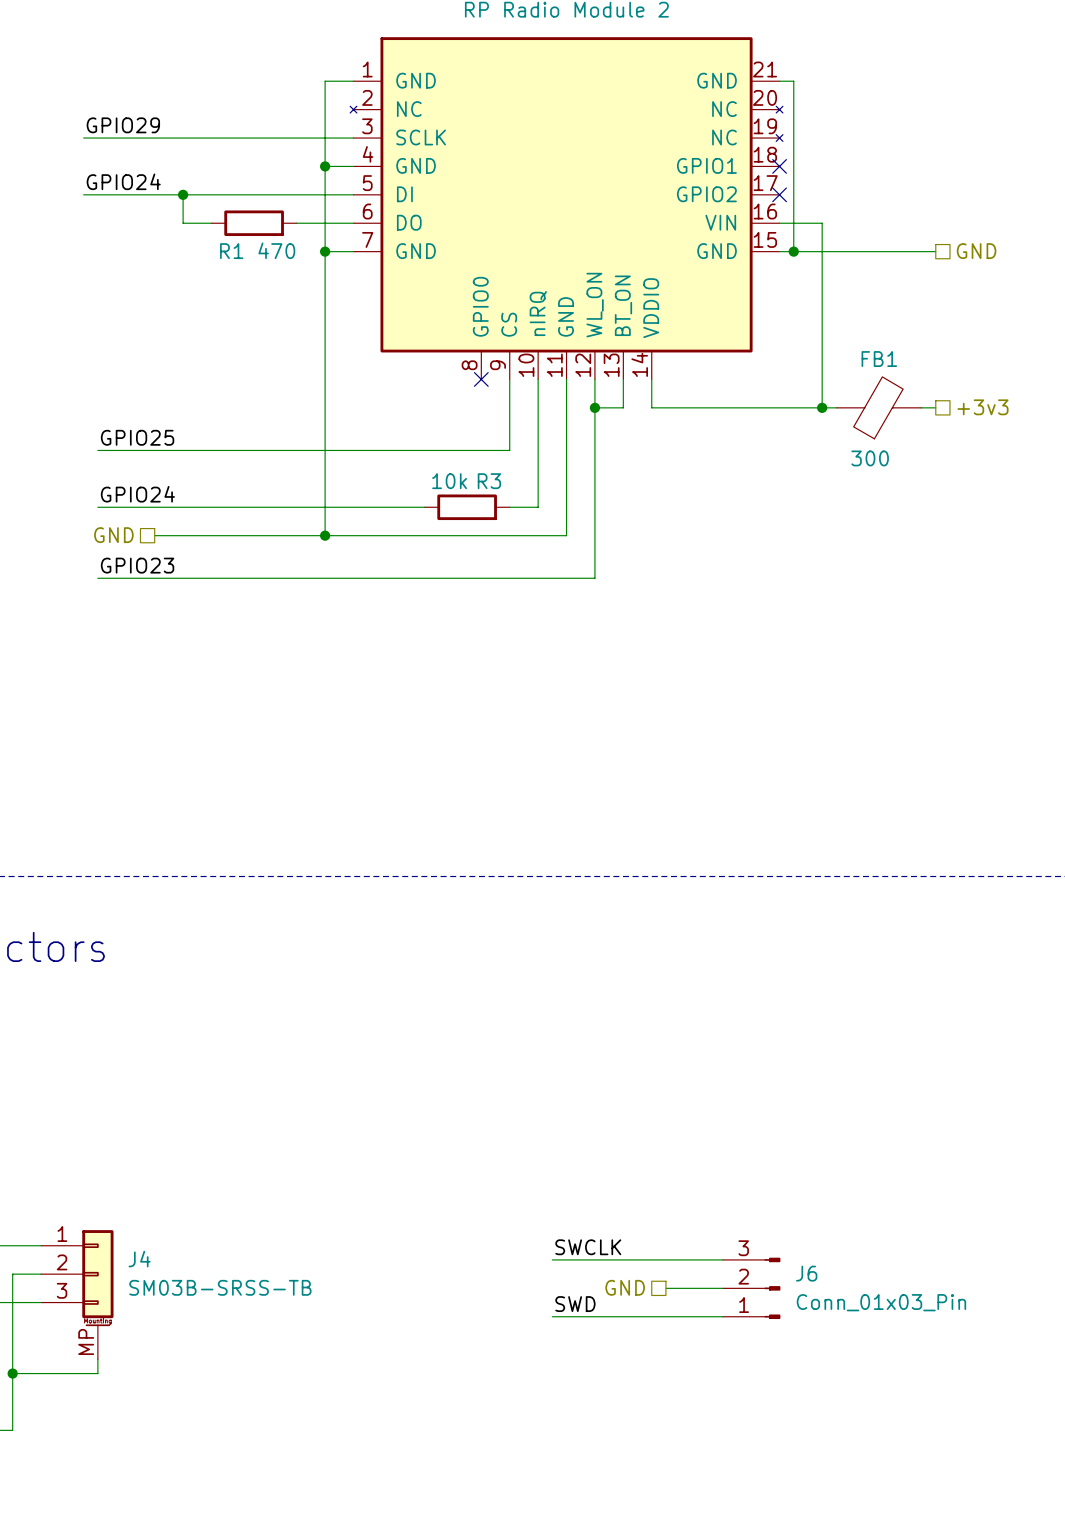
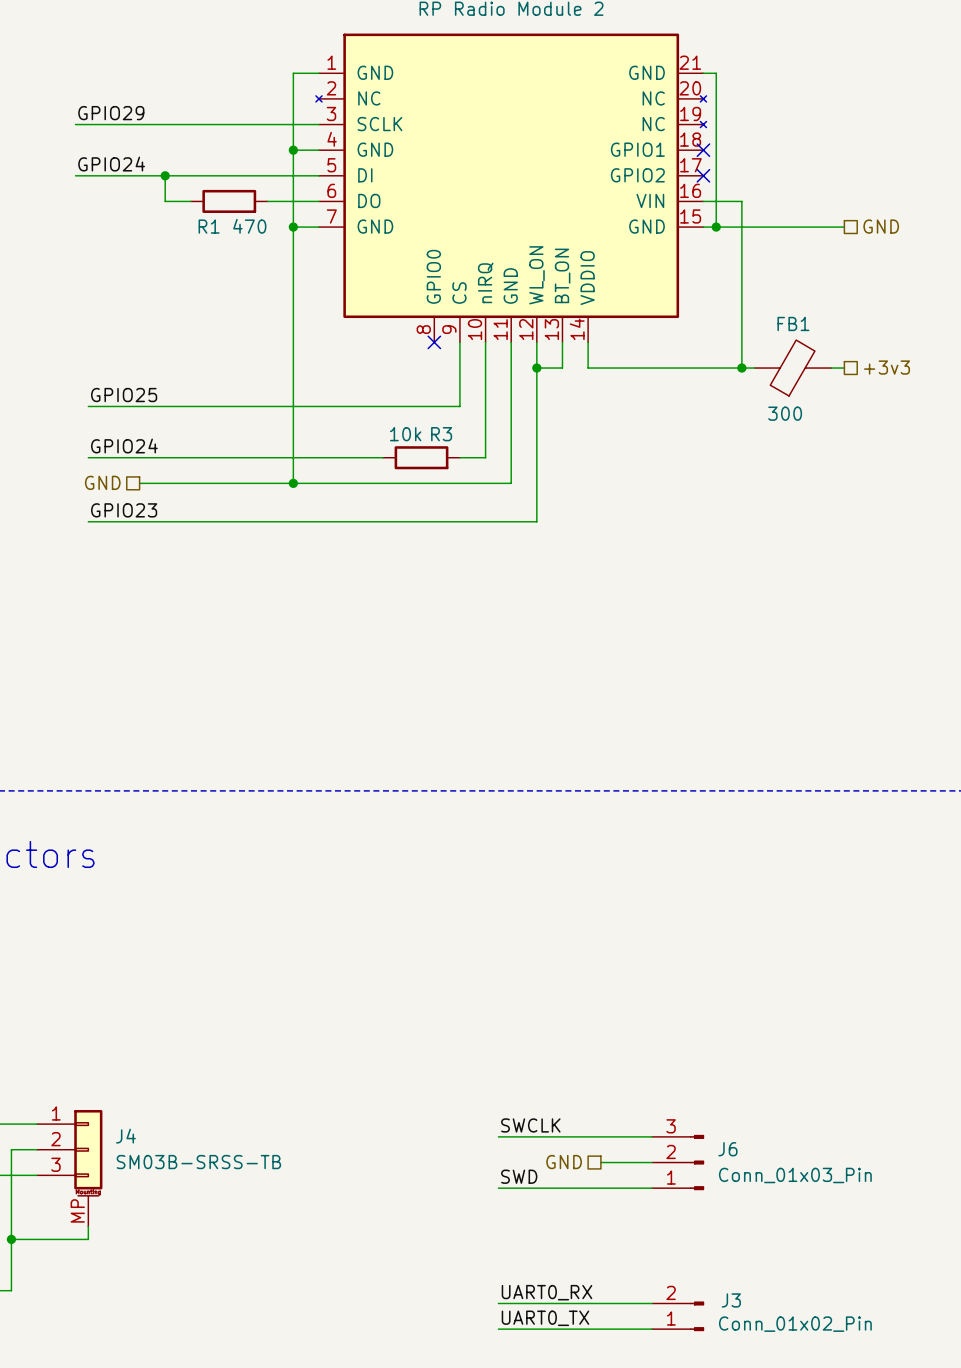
label: none -> UART0_RX (547, 1292)
wire: none -> (498, 1303) (652, 1303)
J3: none -> Conn_01x02_Pin (678, 1316)
label: none -> UART0_TX (545, 1318)
wire: none -> (498, 1329) (652, 1329)

